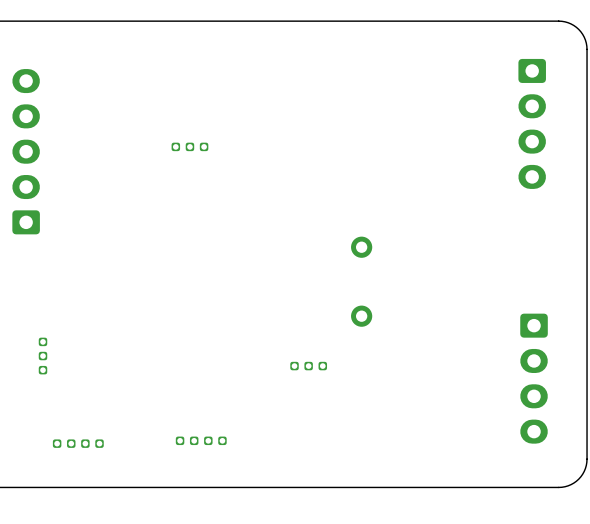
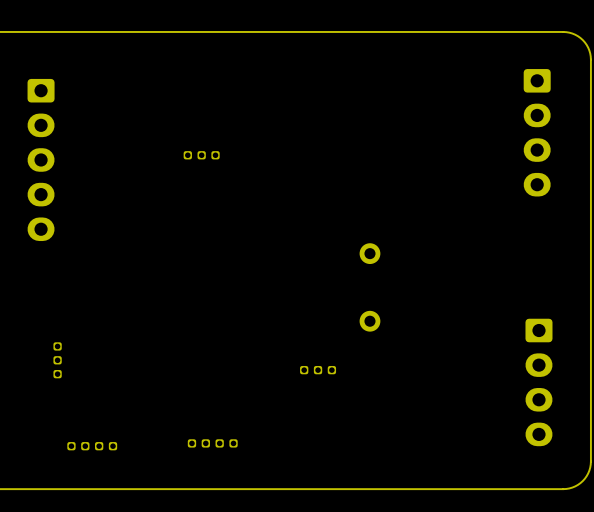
part rotation: 0° (26, 151) -> 180° (41, 159)

